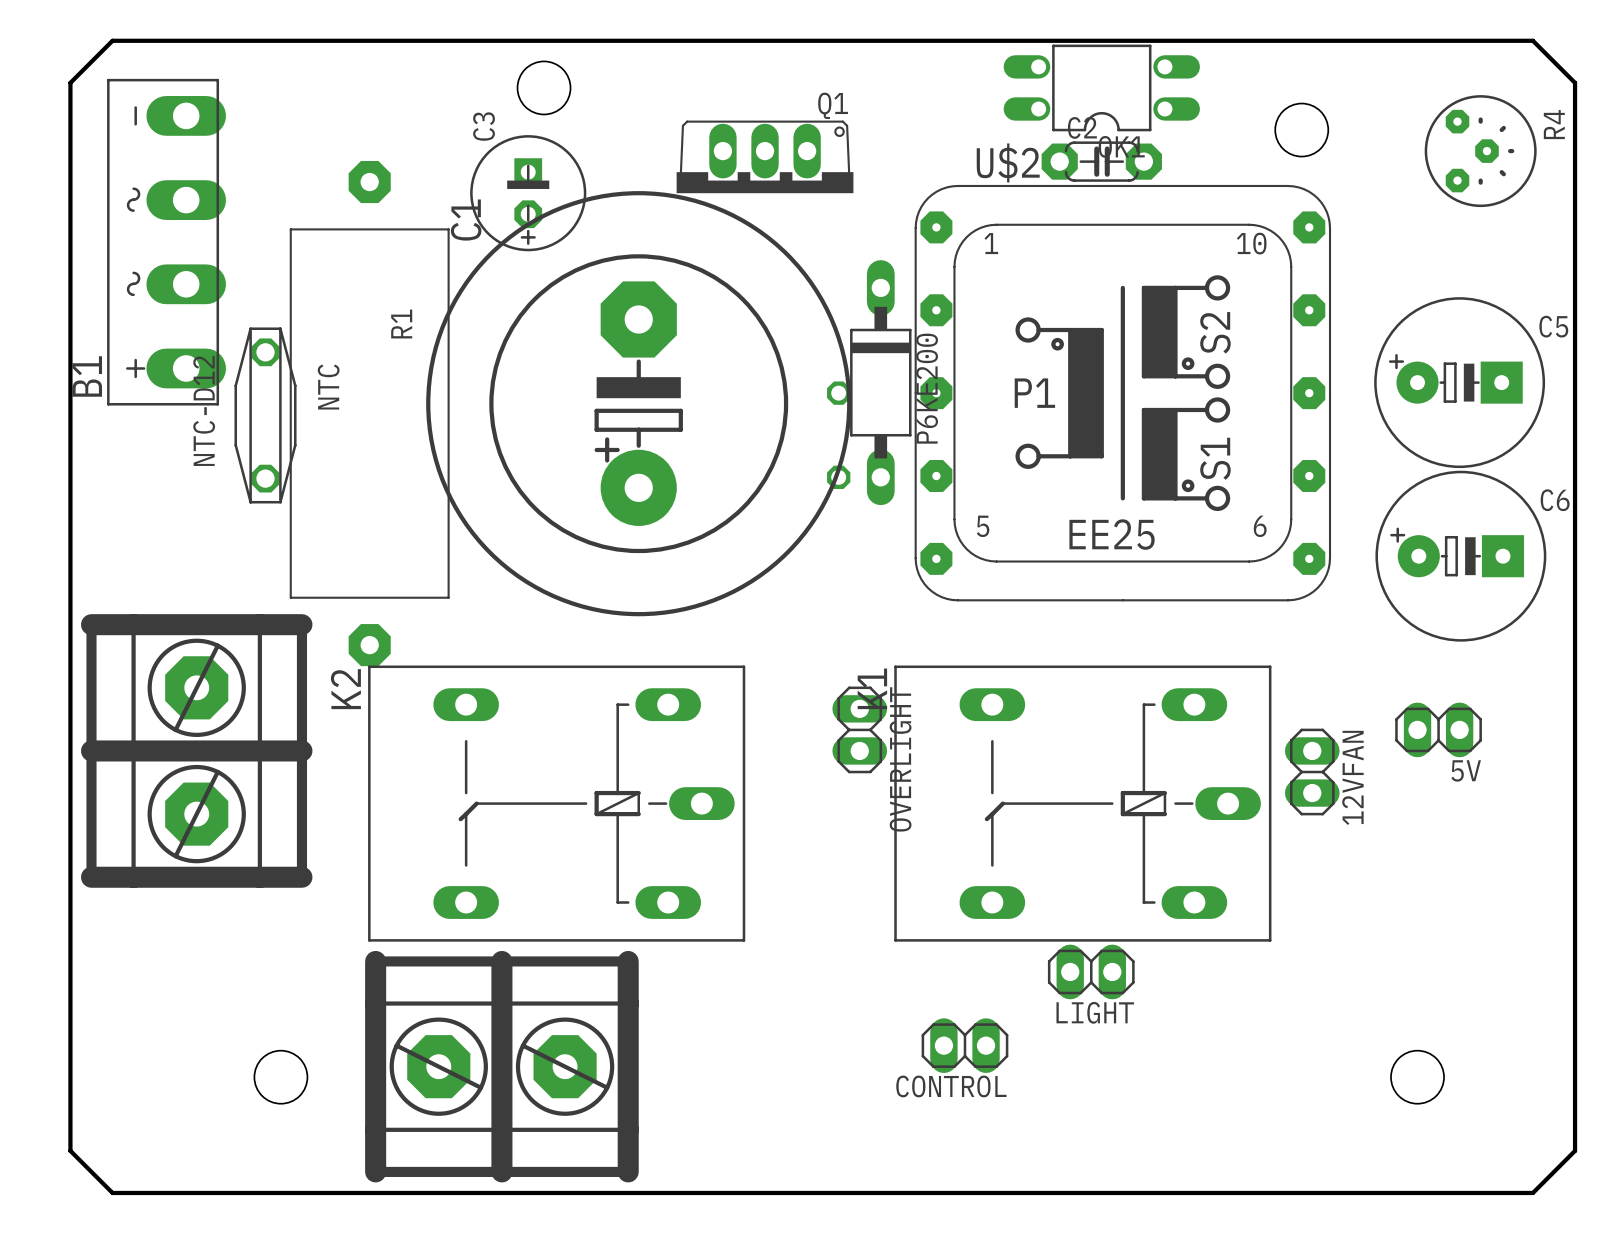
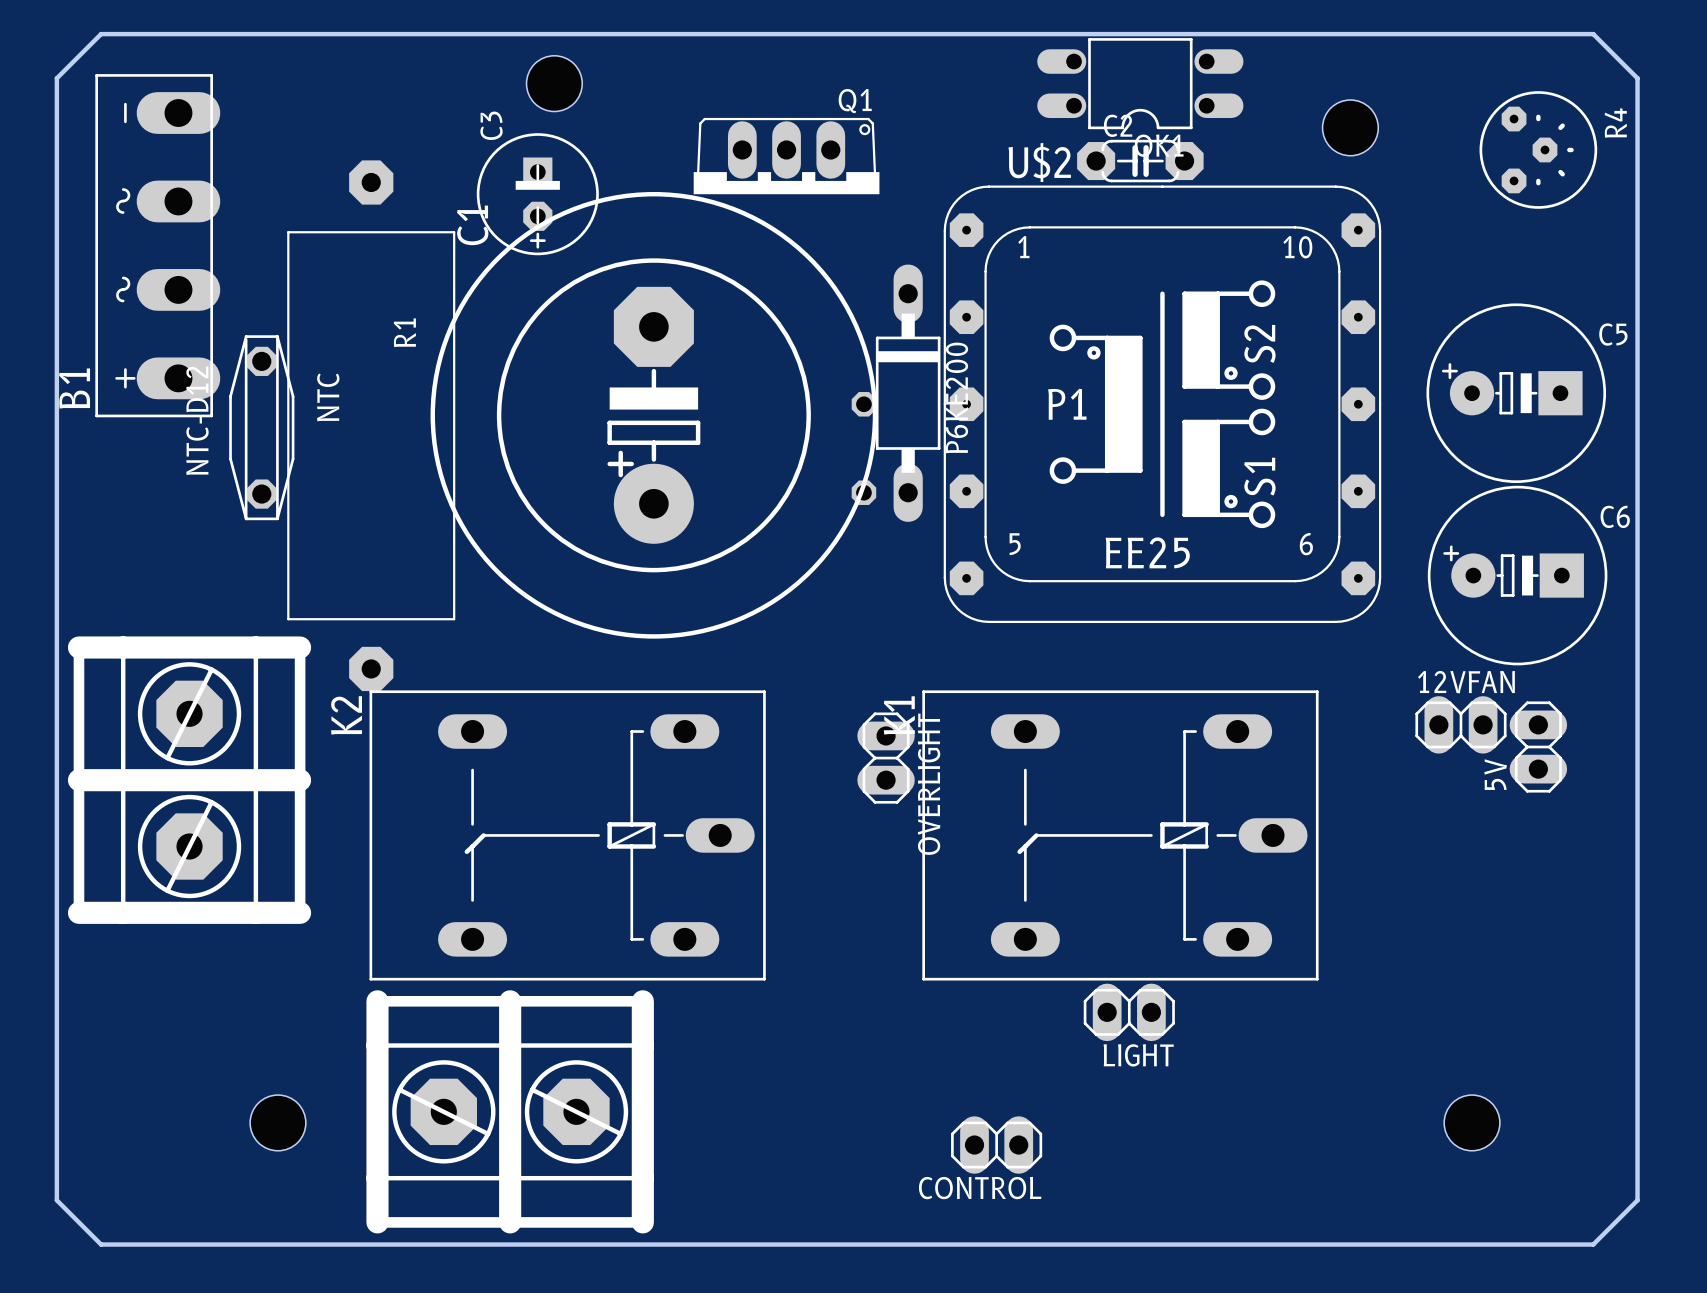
5V rotation: 0° (1438, 729) -> 90° clockwise (1538, 747)
12VFAN rotation: 0° (1312, 772) -> 90° clockwise (1460, 724)
12VFAN position: (1312, 772) -> (1460, 724)
12VFAN name position: 12VFAN (1352, 777) -> 12VFAN (1466, 682)
CONTROL position: (964, 1045) -> (996, 1145)

